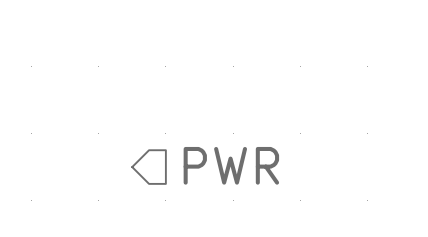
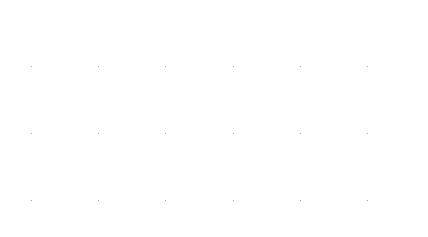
hierarchical label: PWR (231, 165) -> none

